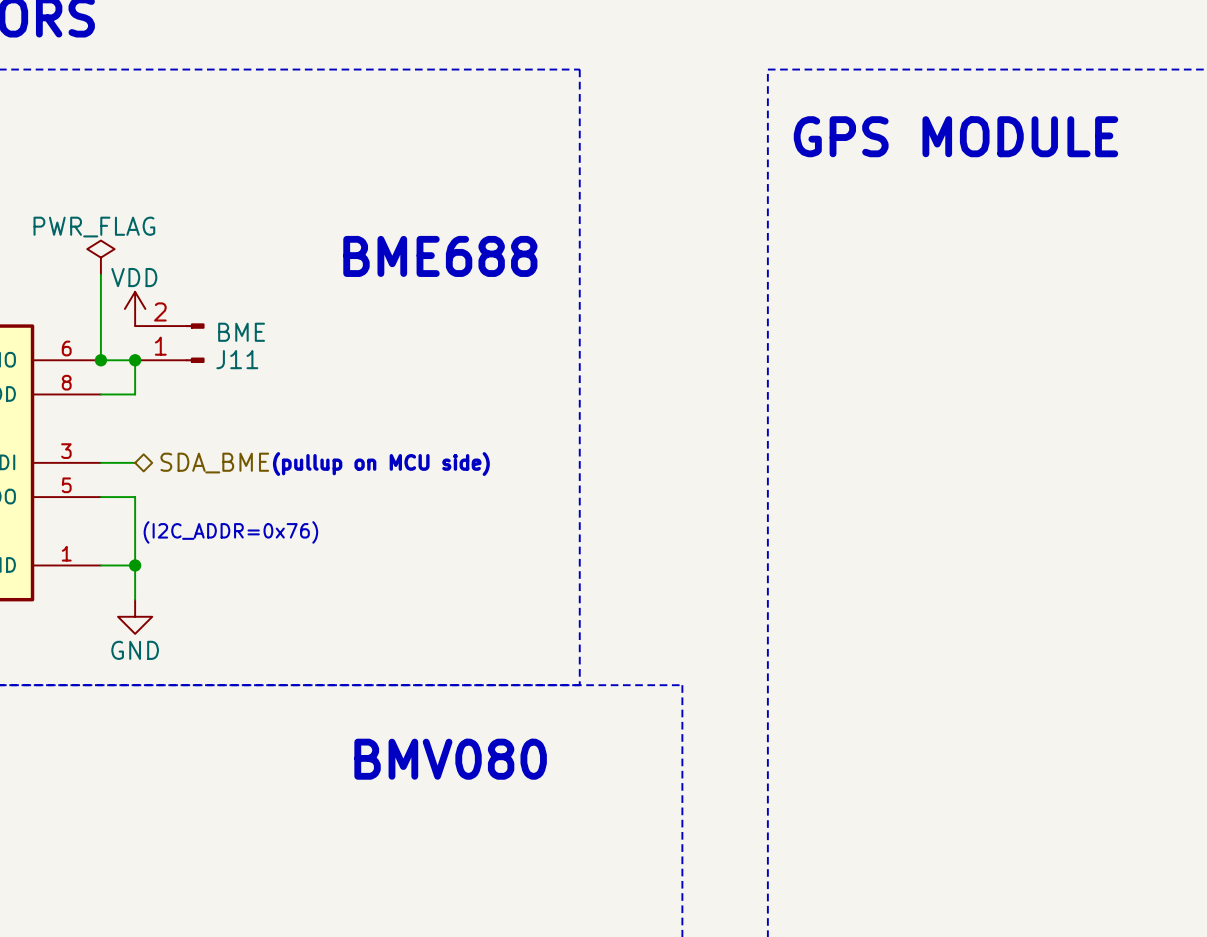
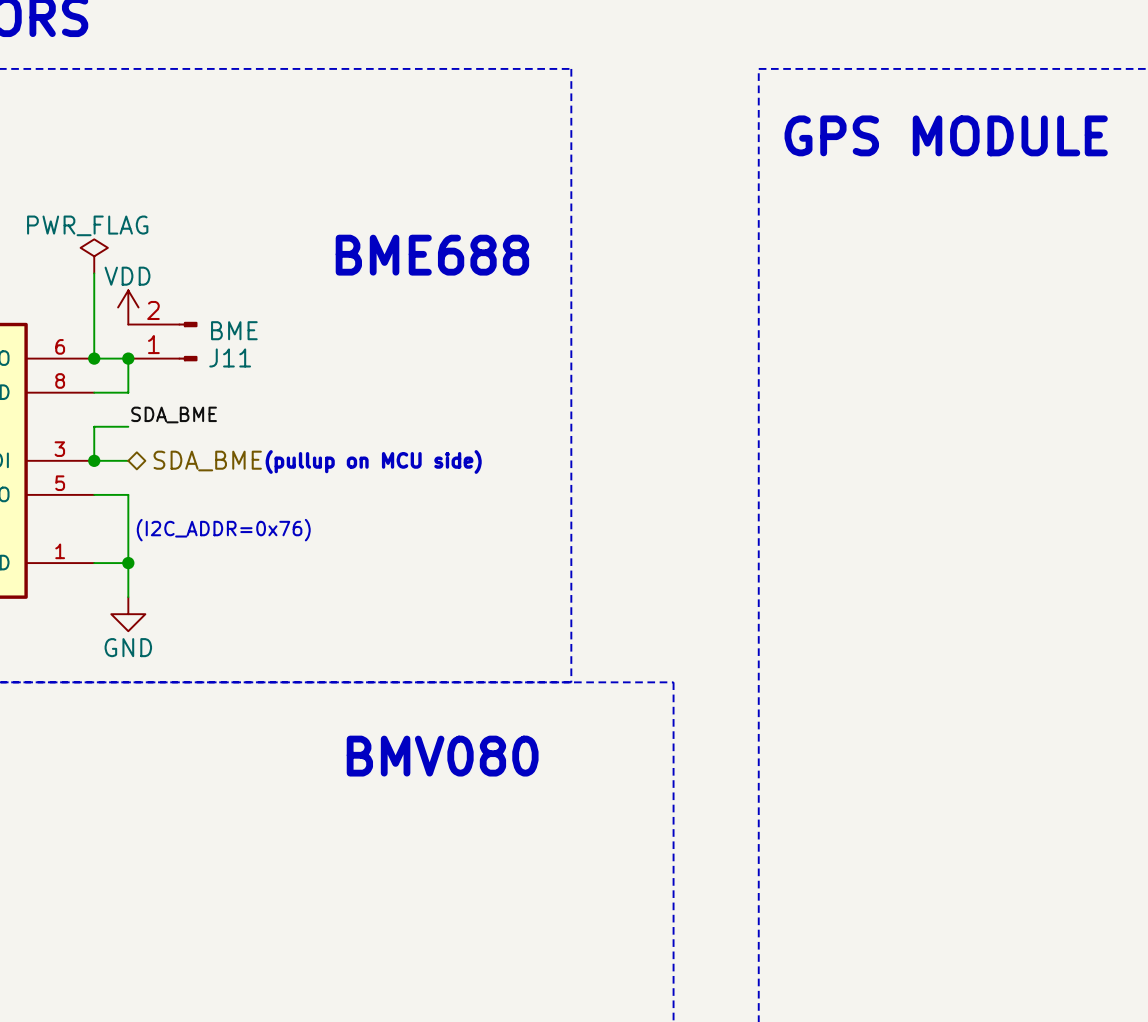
label: none -> SDA_BME (174, 414)
wire: none -> (128, 426) (94, 426) (94, 460)
junction: none -> (94, 460)

